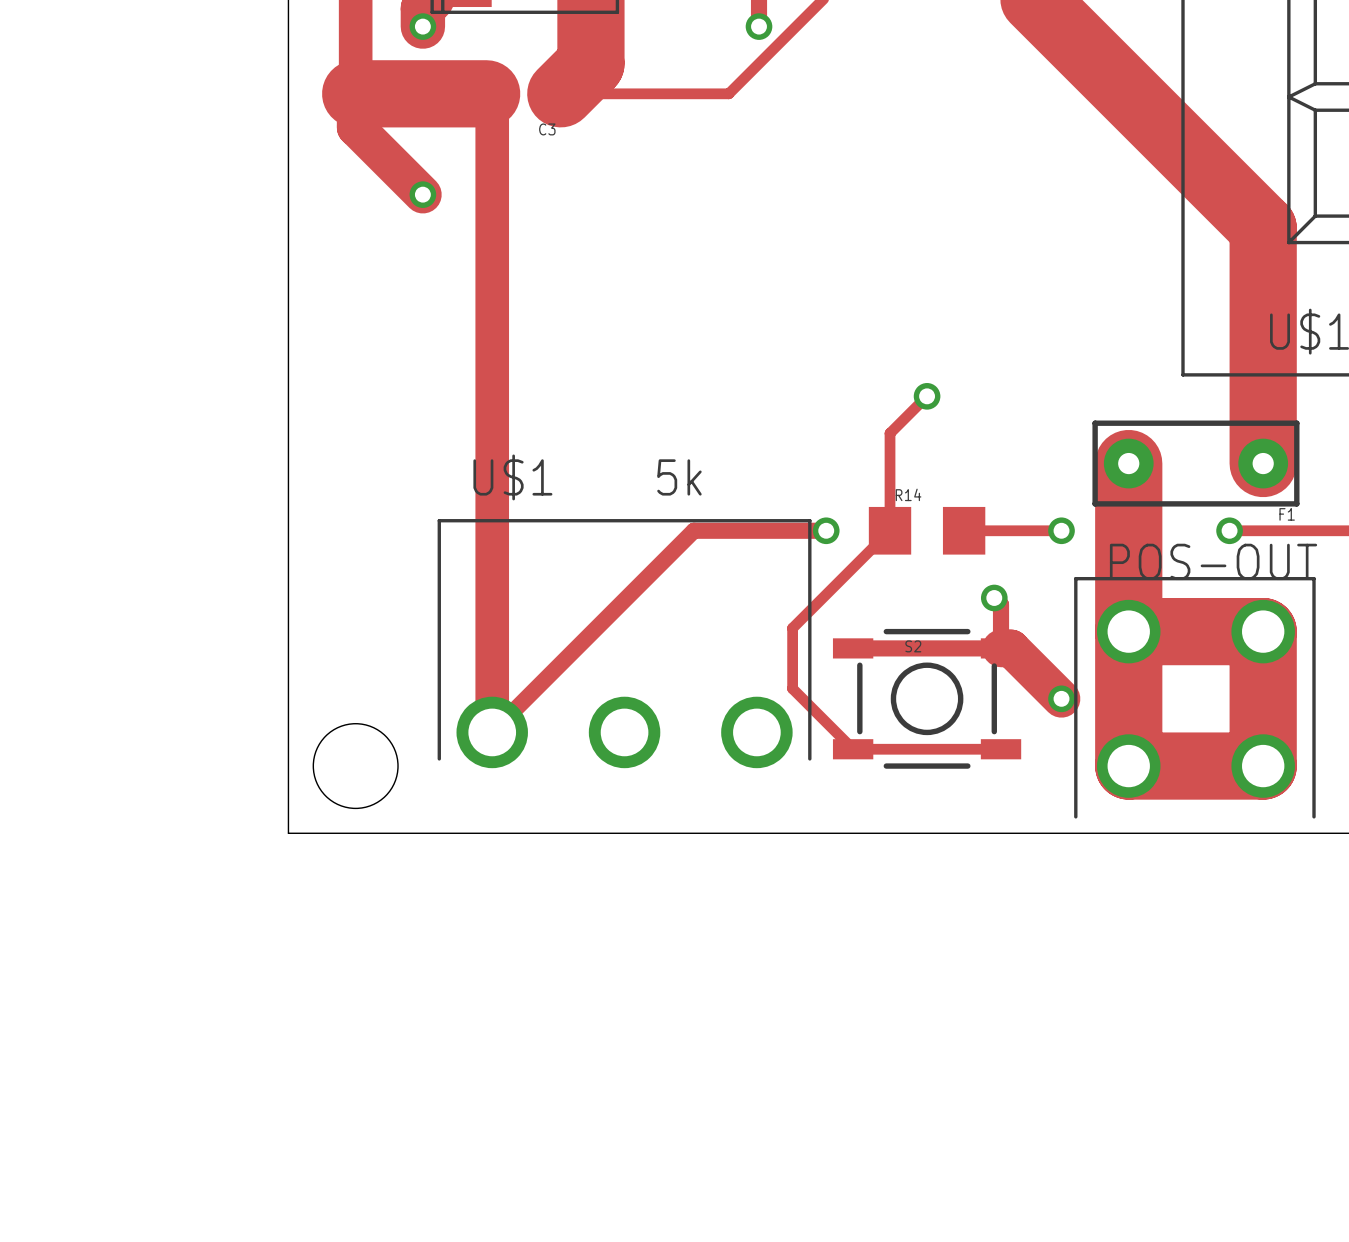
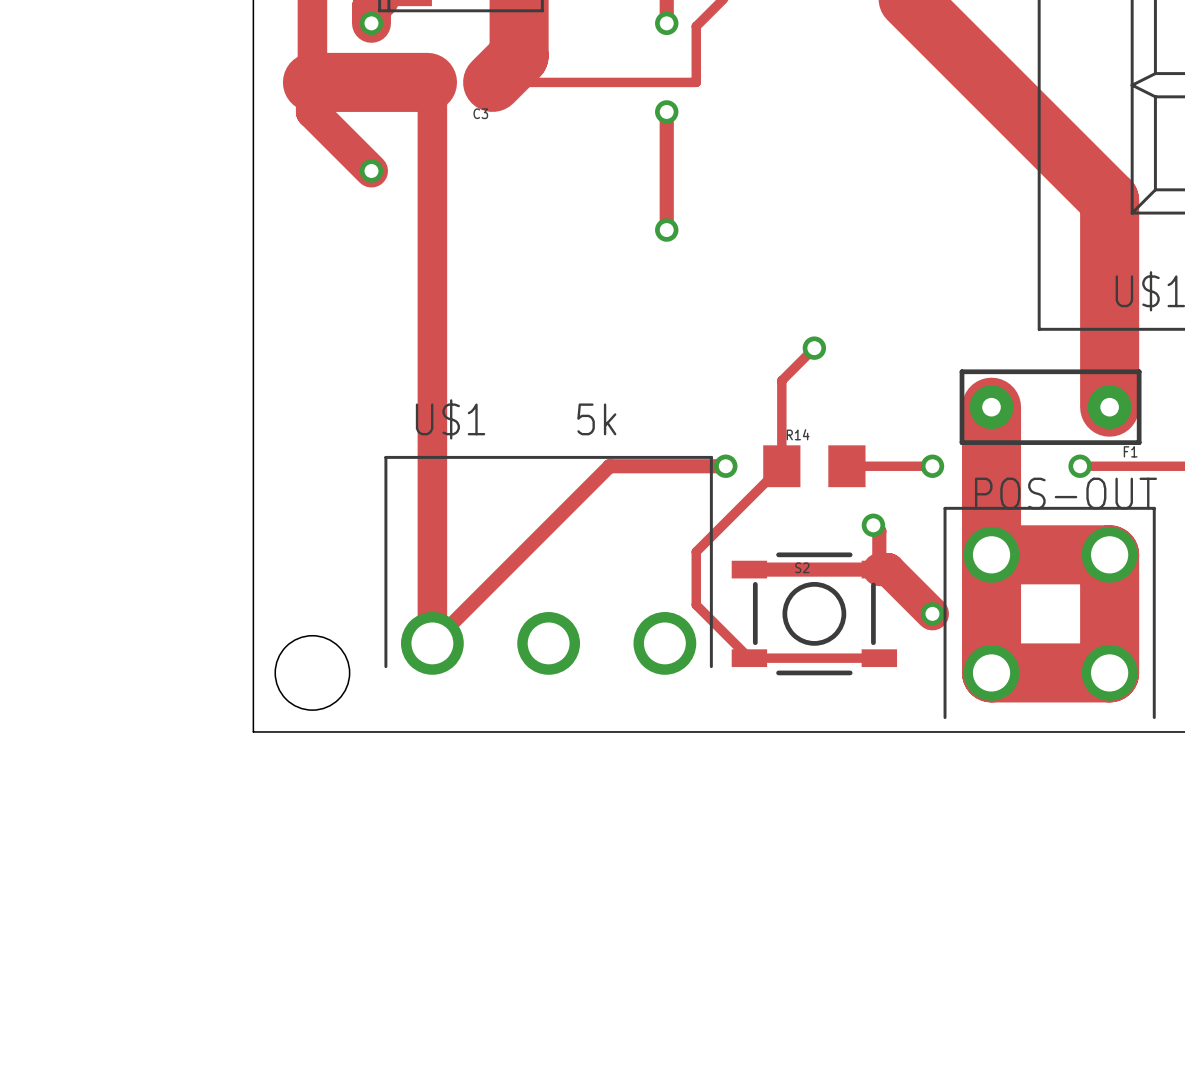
track: (792, 30) (728, 93) -> (696, 26) (696, 82) (640, 82)
track: none -> (666, 111) (666, 230)
via: none -> (666, 111)
via: none -> (666, 230)

